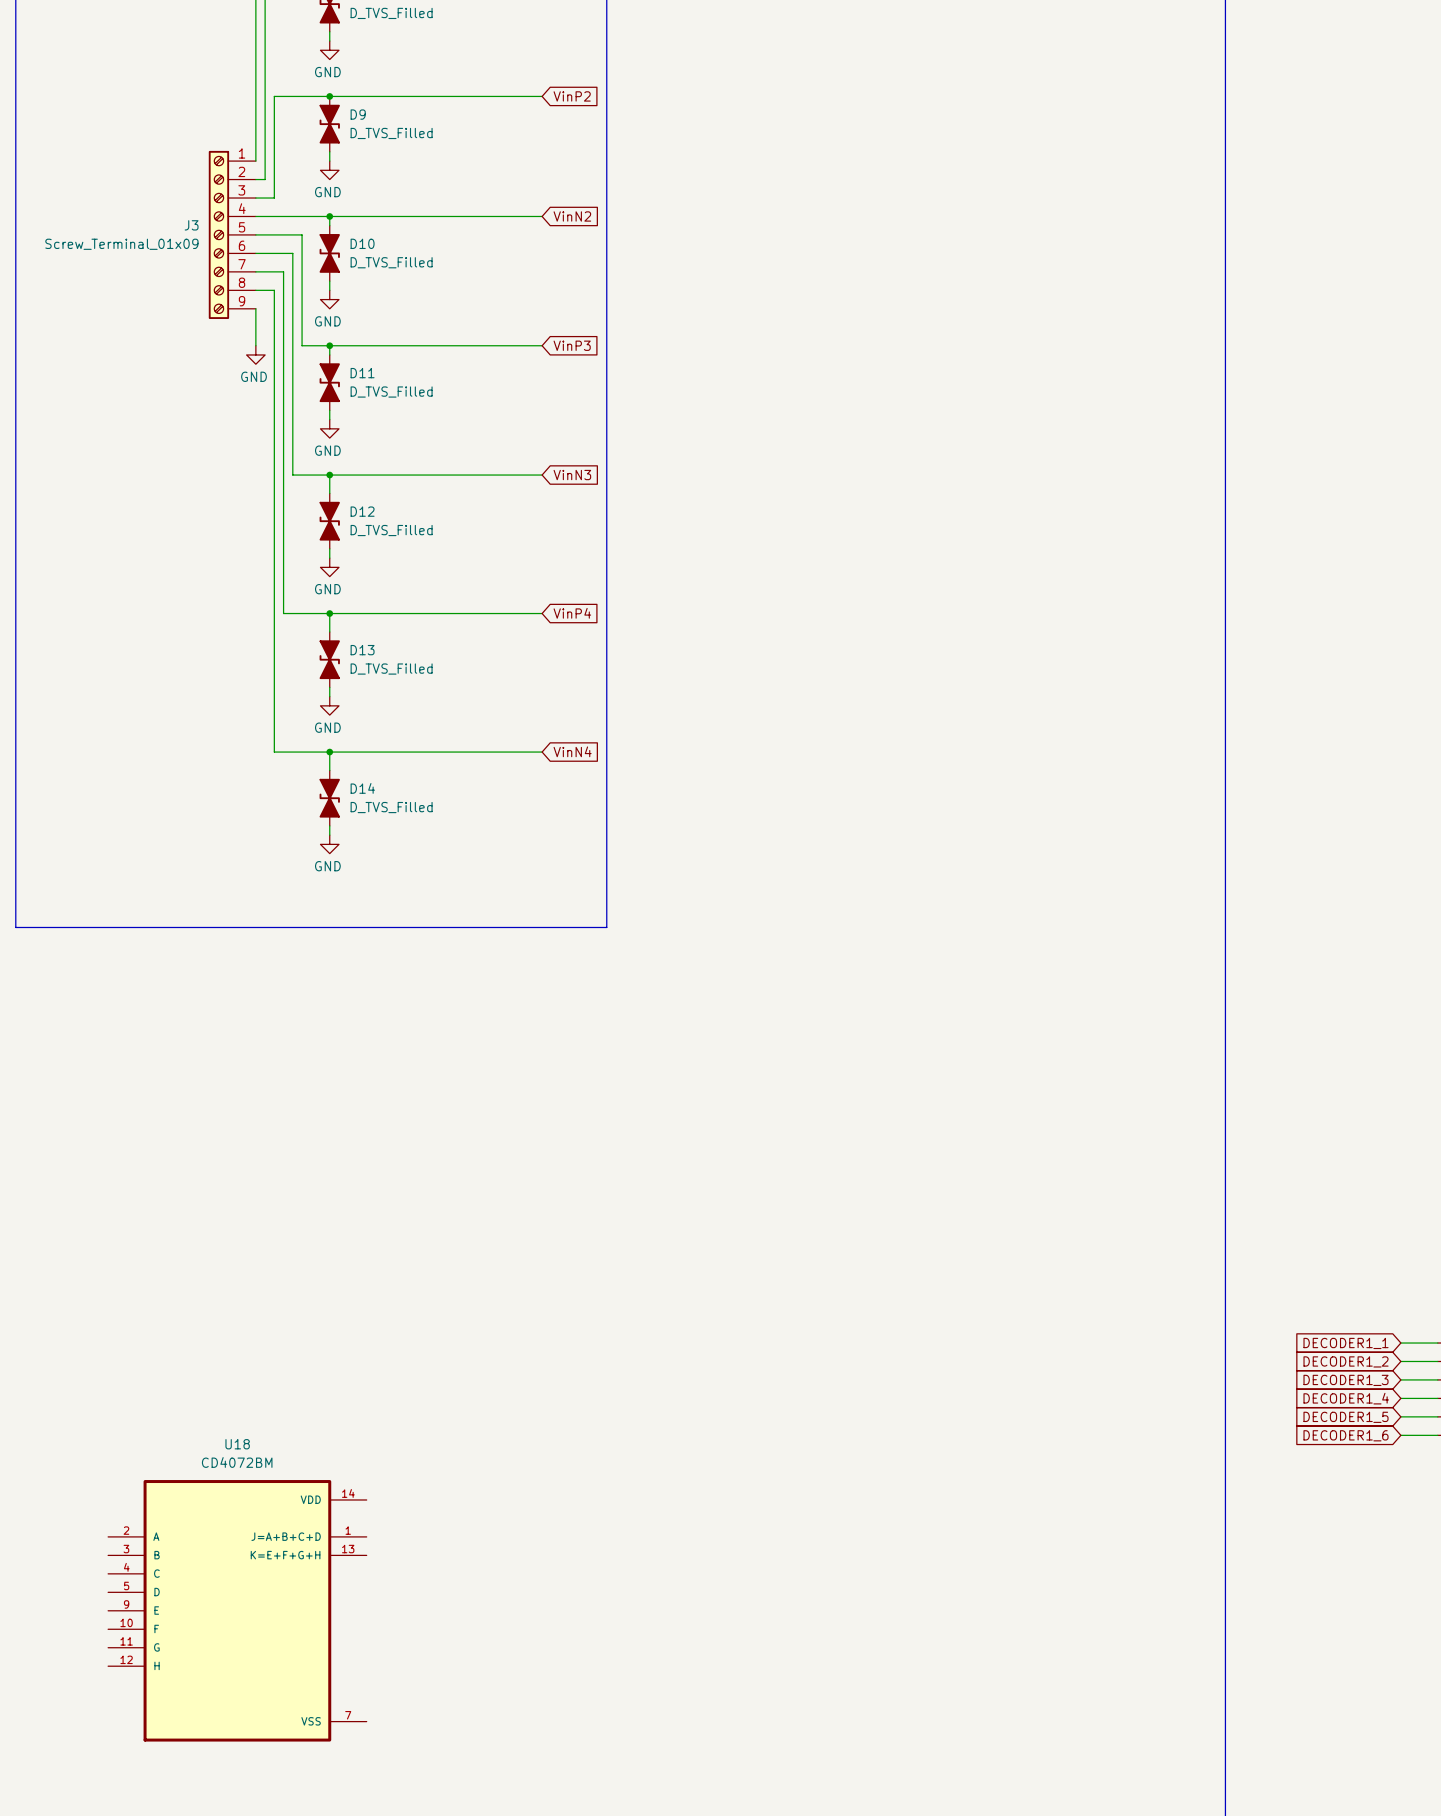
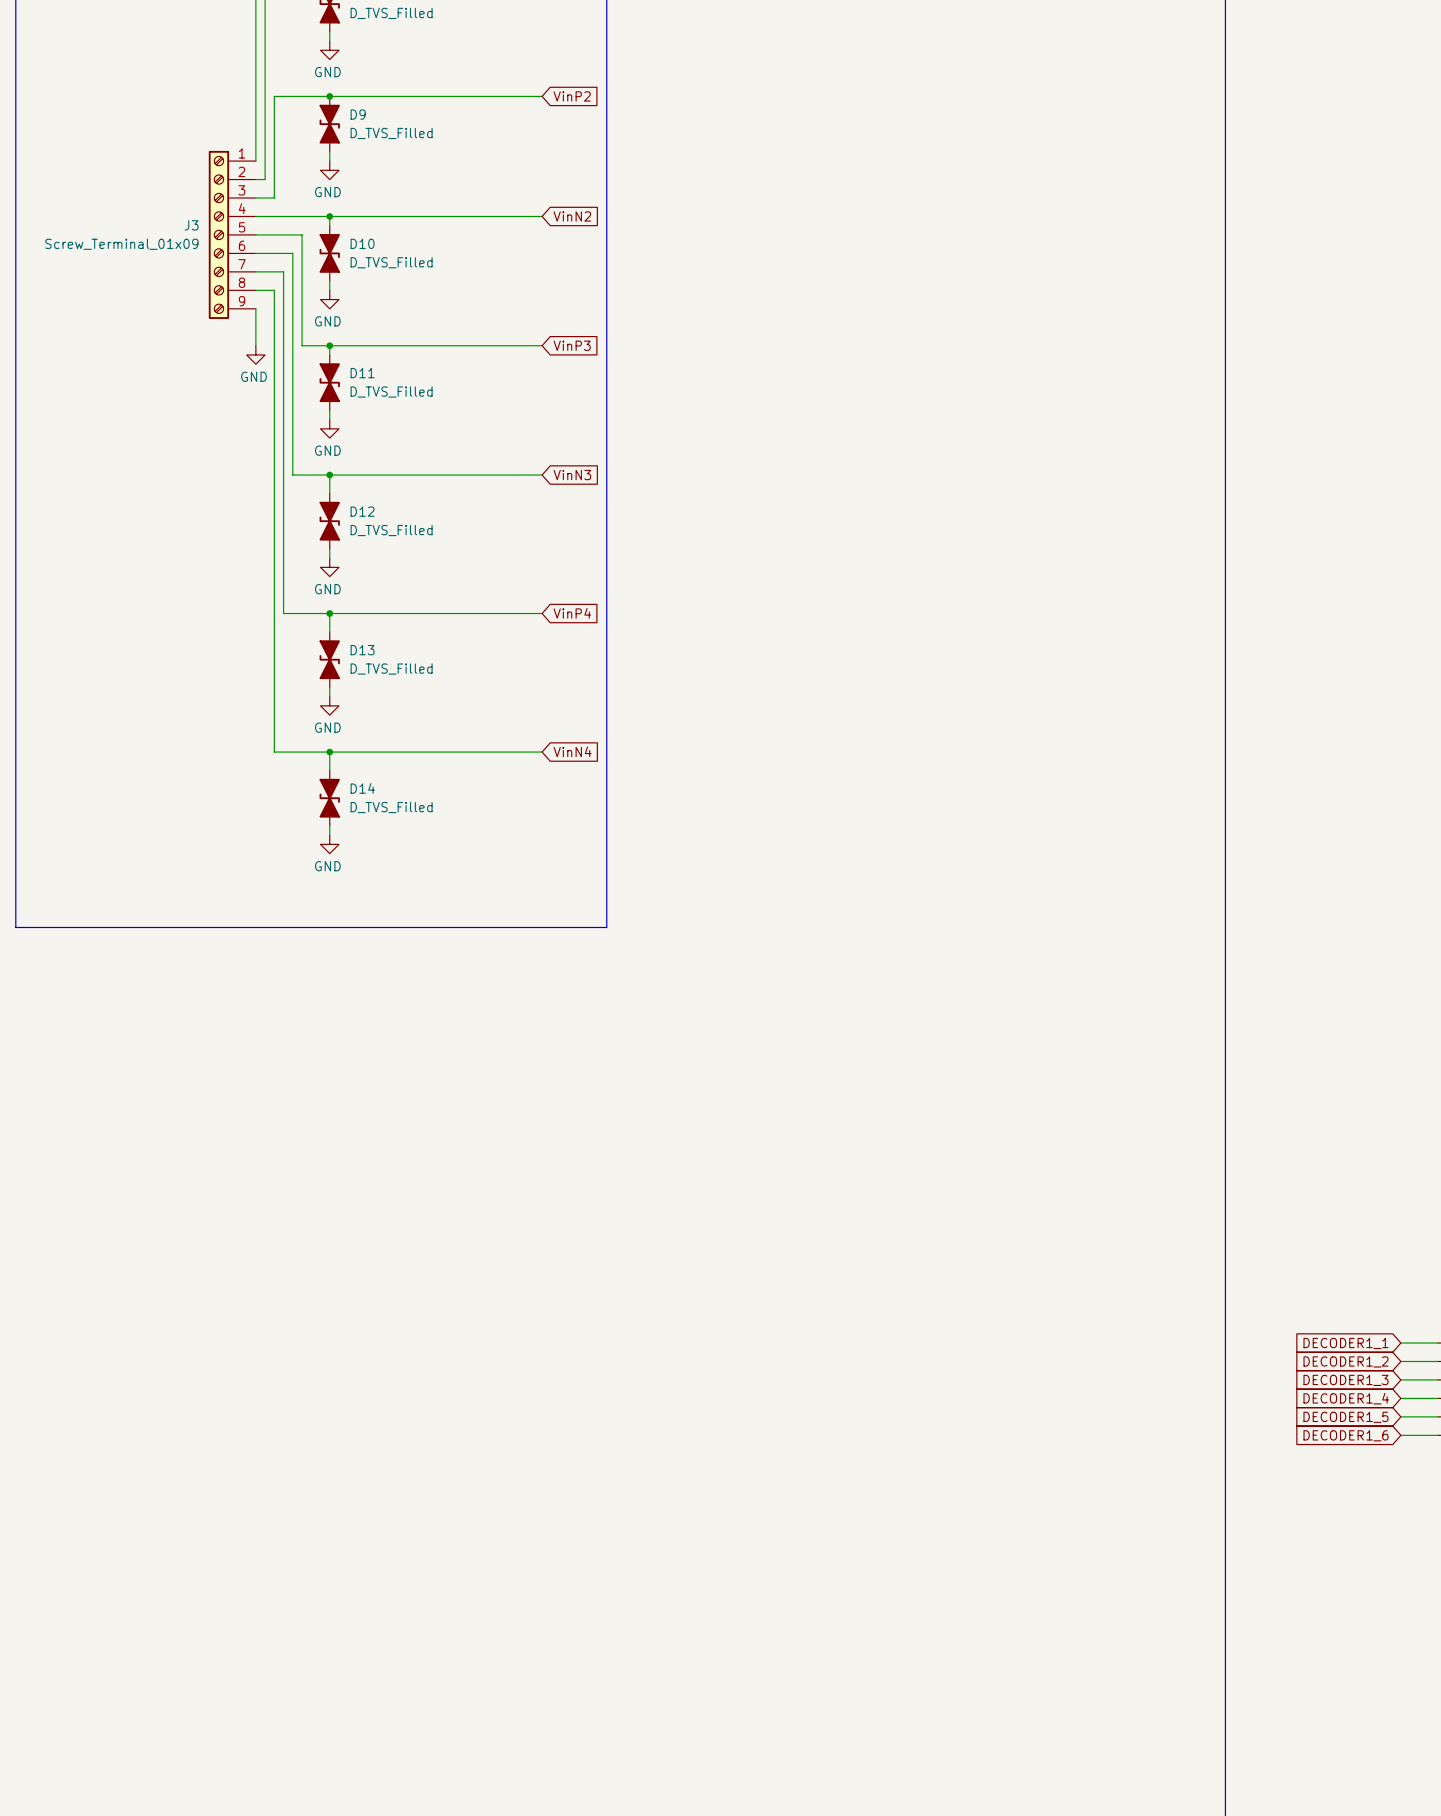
U18: CD4072BM (237, 1610) -> none

